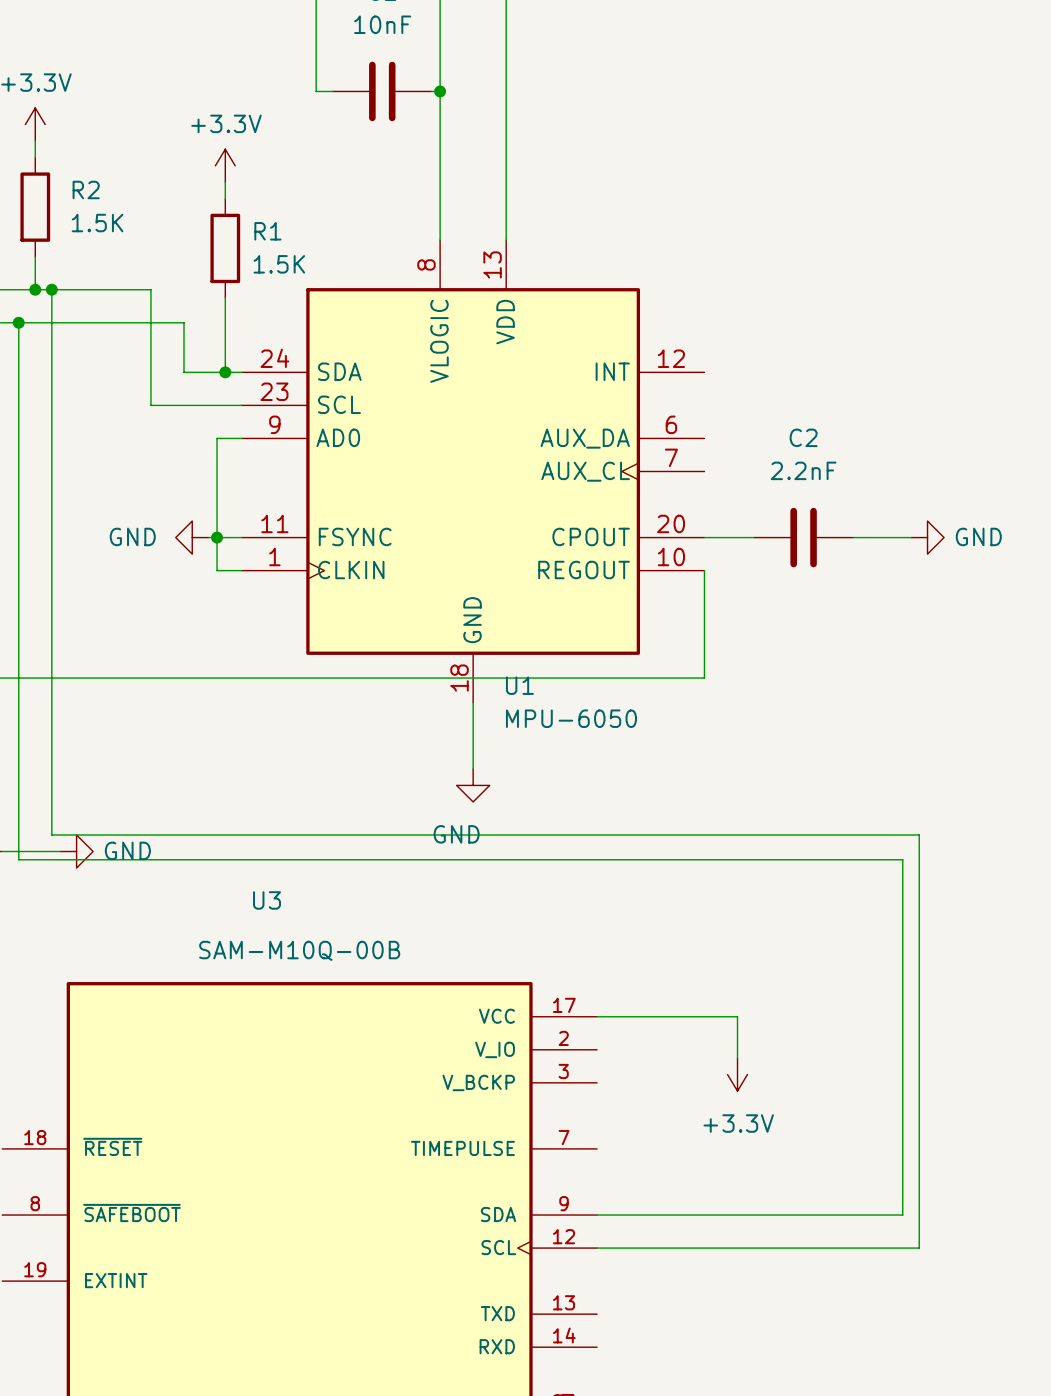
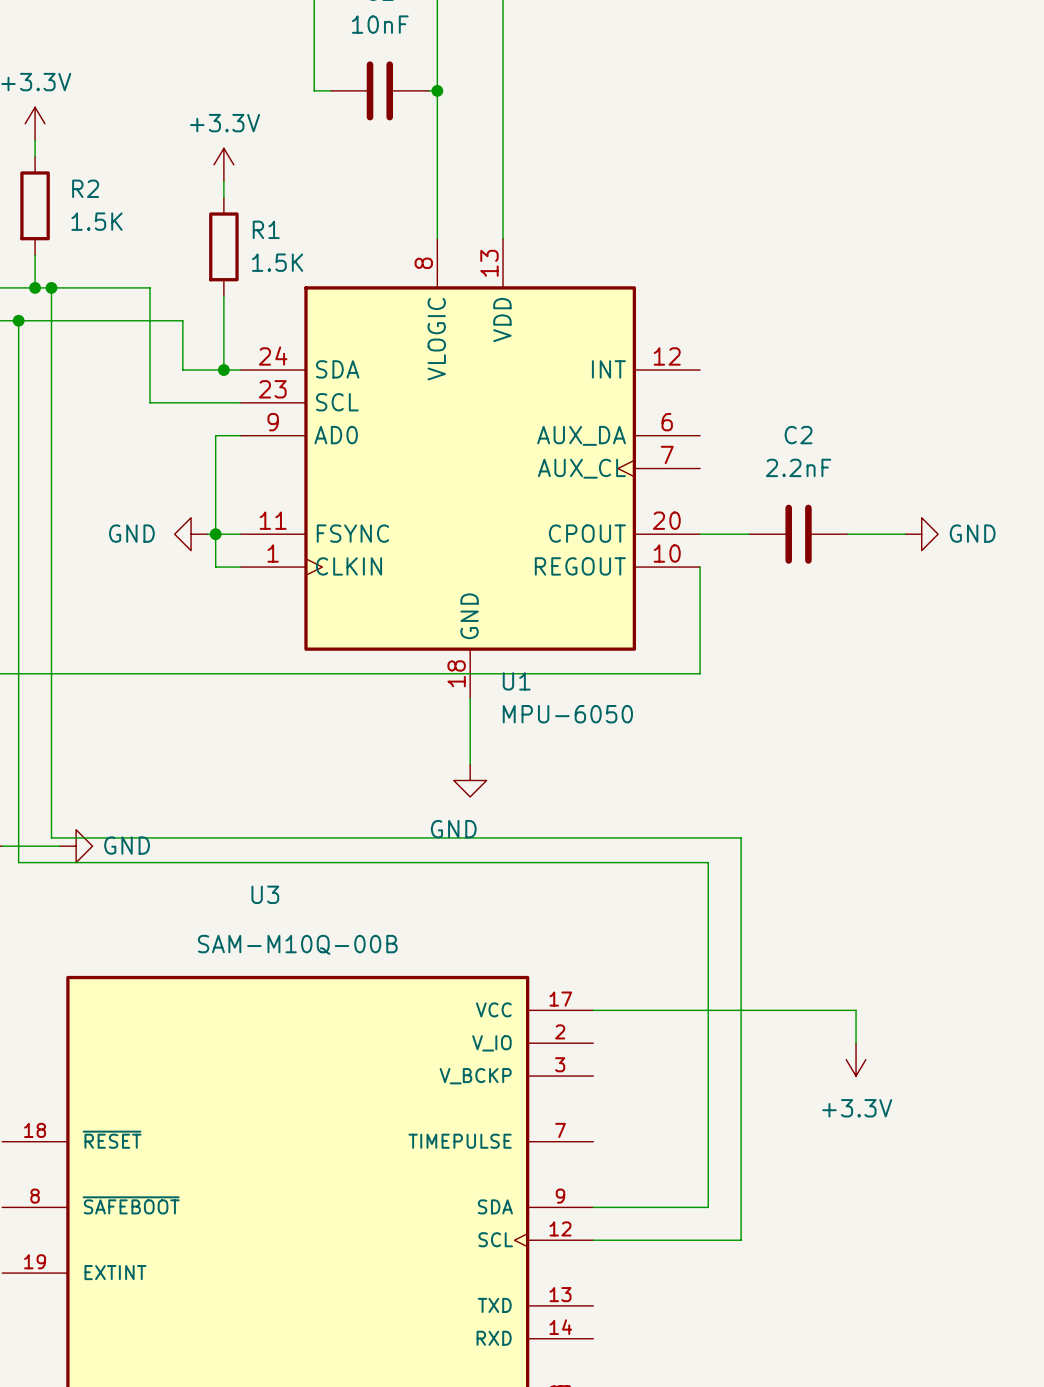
wire: (51, 834) (919, 834) (919, 1248) (745, 1248) -> (51, 829) (51, 837) (741, 837) (741, 1240)
wire: (18, 859) (902, 859) (902, 1215) (712, 1215) -> (18, 854) (18, 862) (708, 862) (708, 1207)
wire: (737, 1016) (737, 1058) -> (732, 1010) (856, 1010) (856, 1043)
power symbol position: +3.3V (737, 1074) -> +3.3V (856, 1059)

